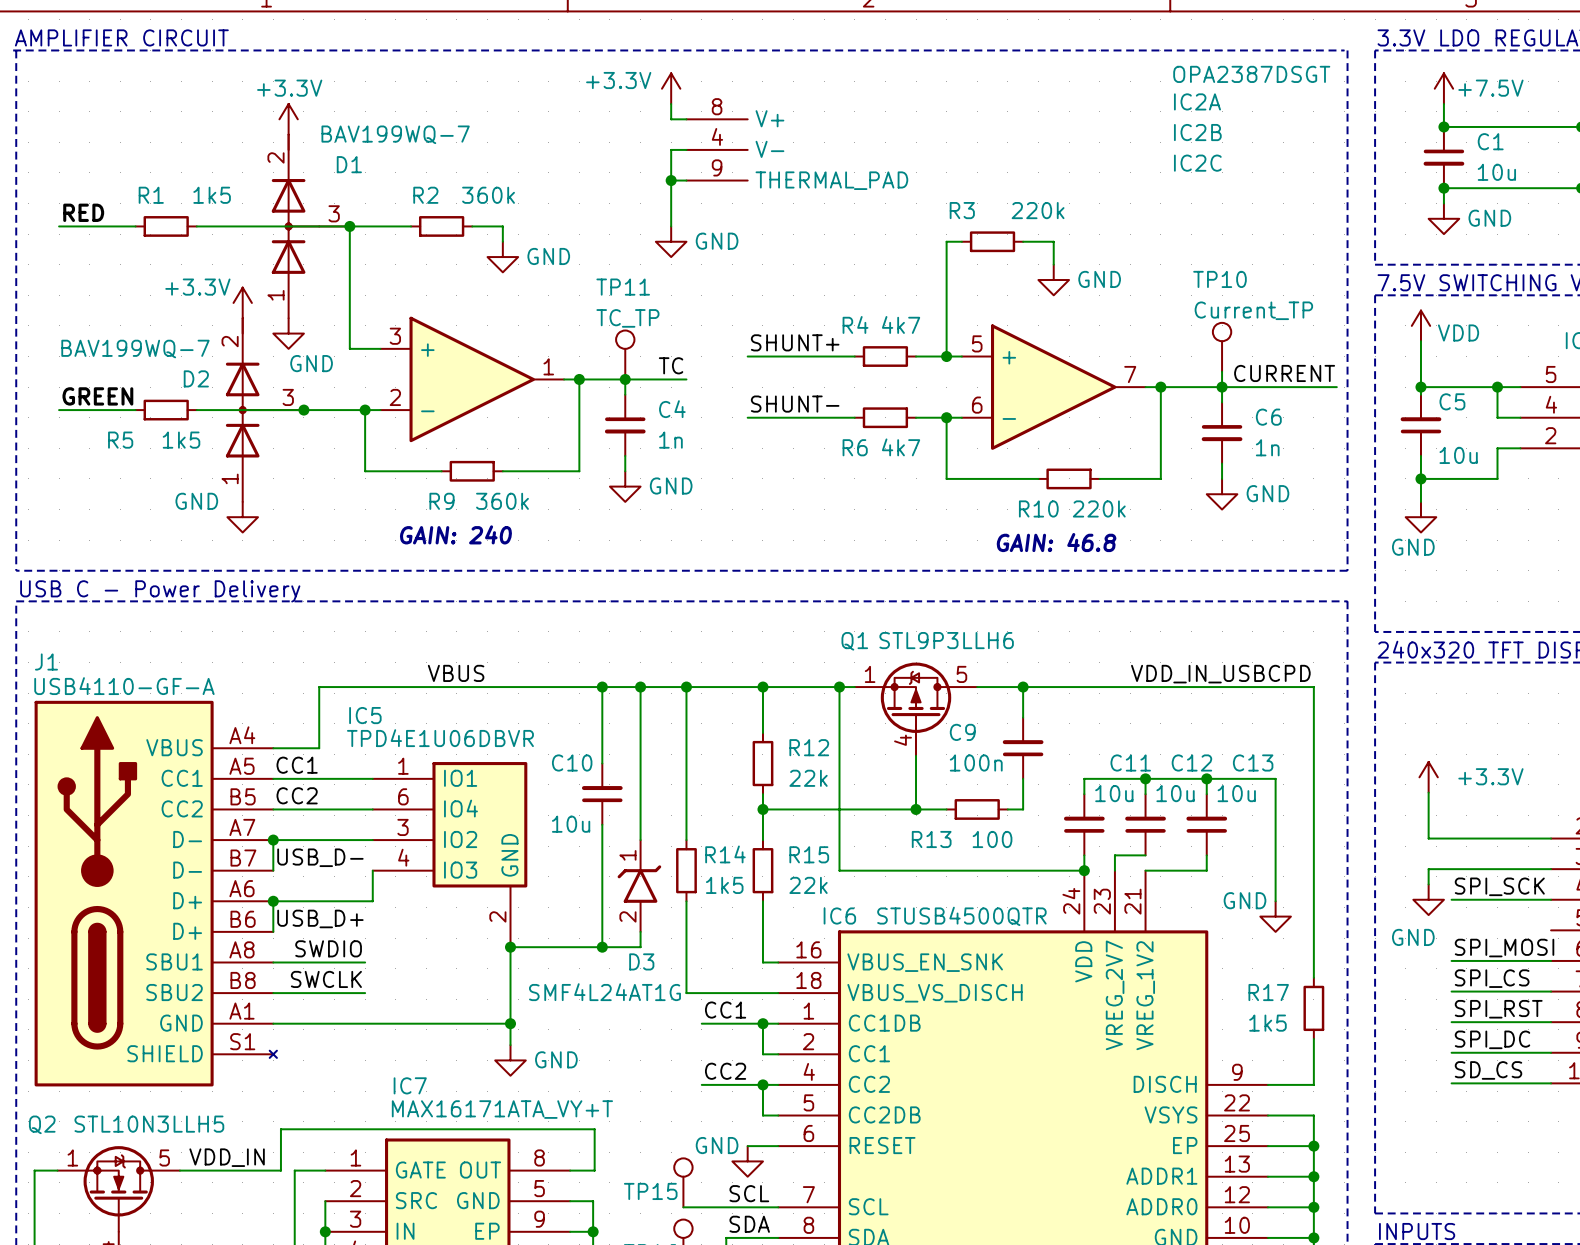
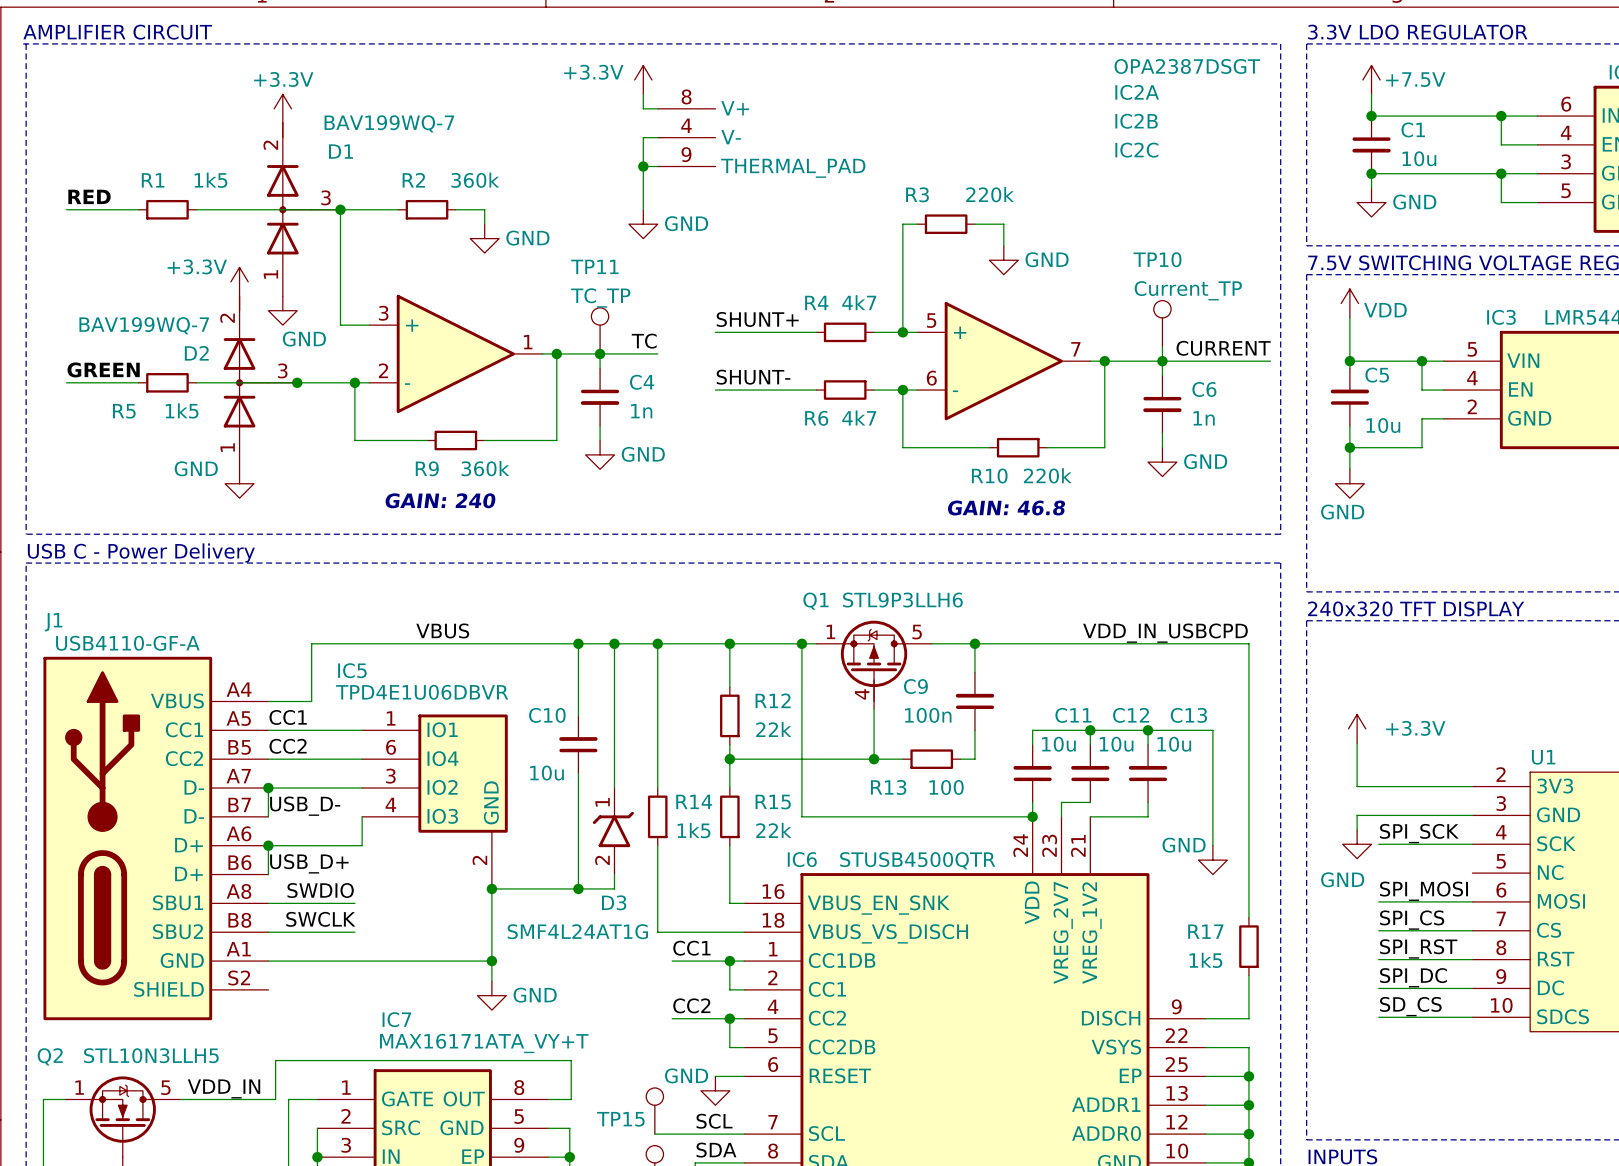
J1 symbol: [34, 700, 277, 1087] -> [43, 656, 269, 1021]

